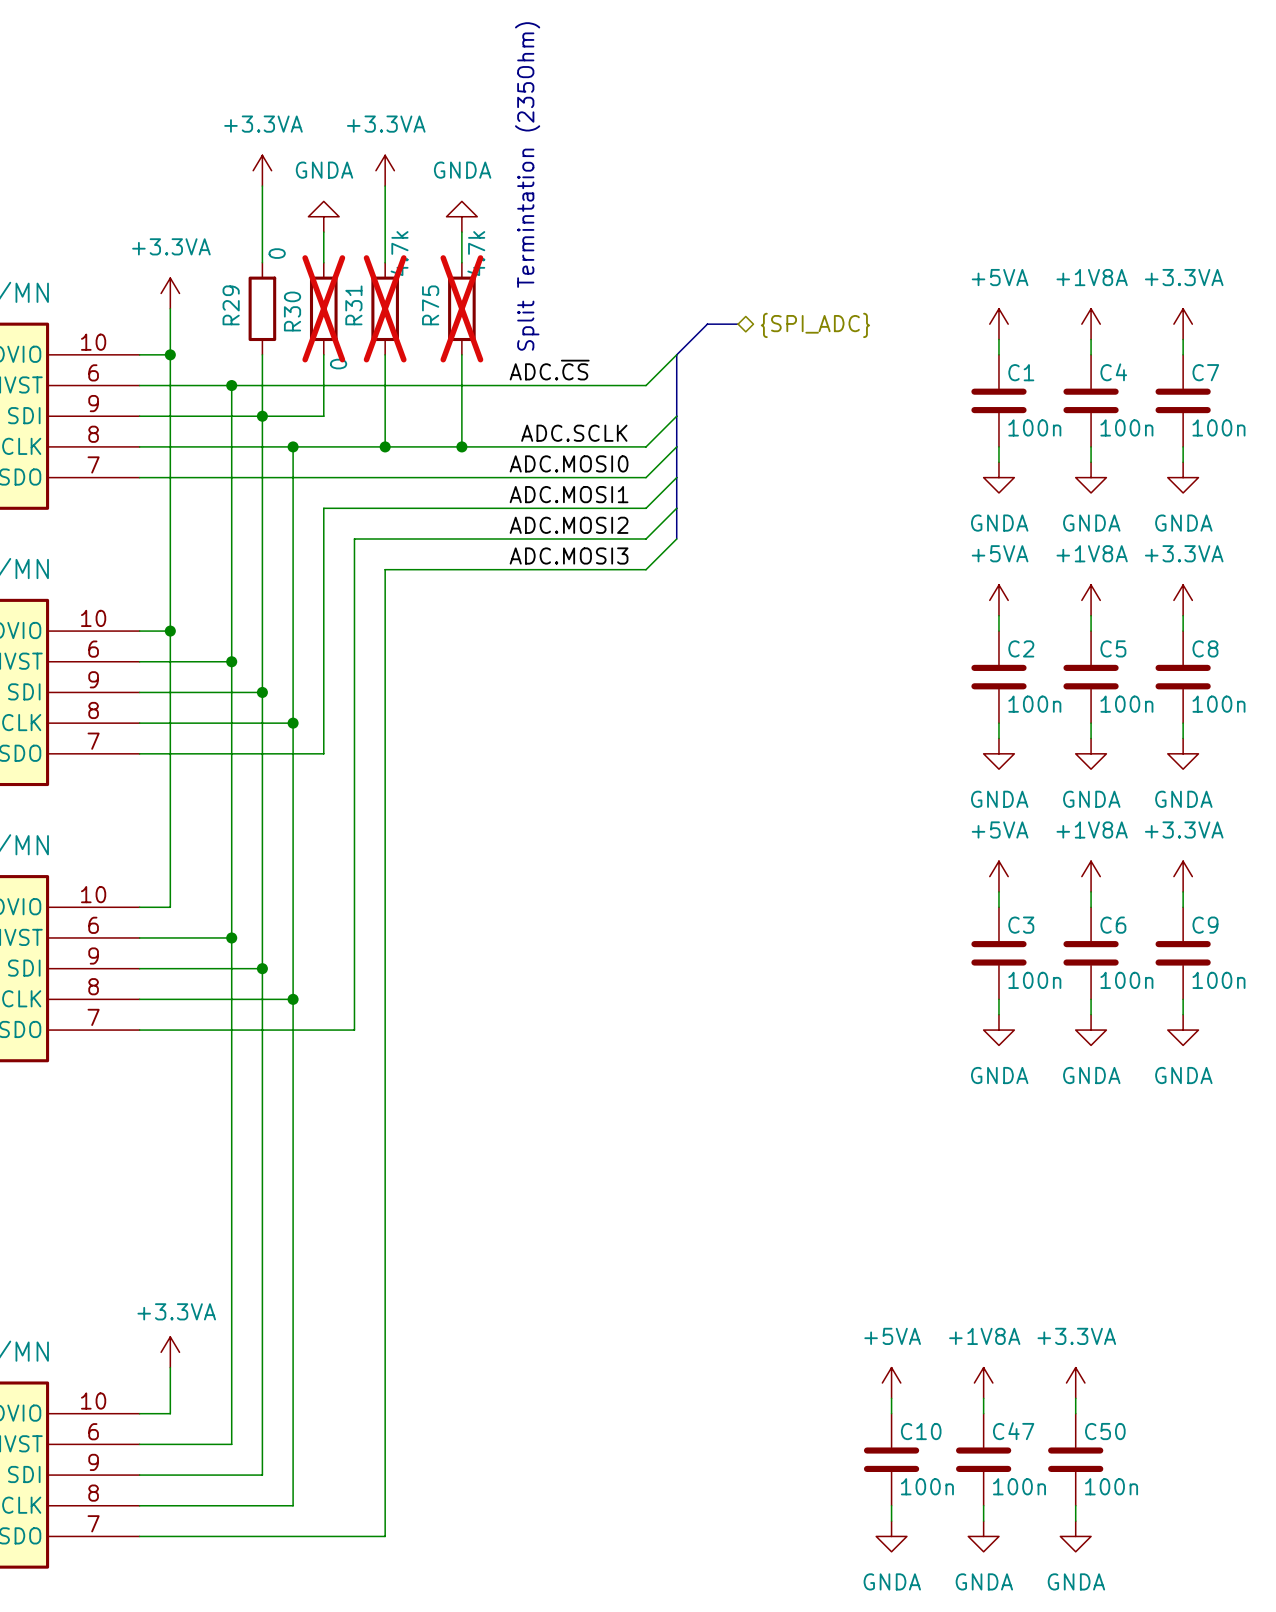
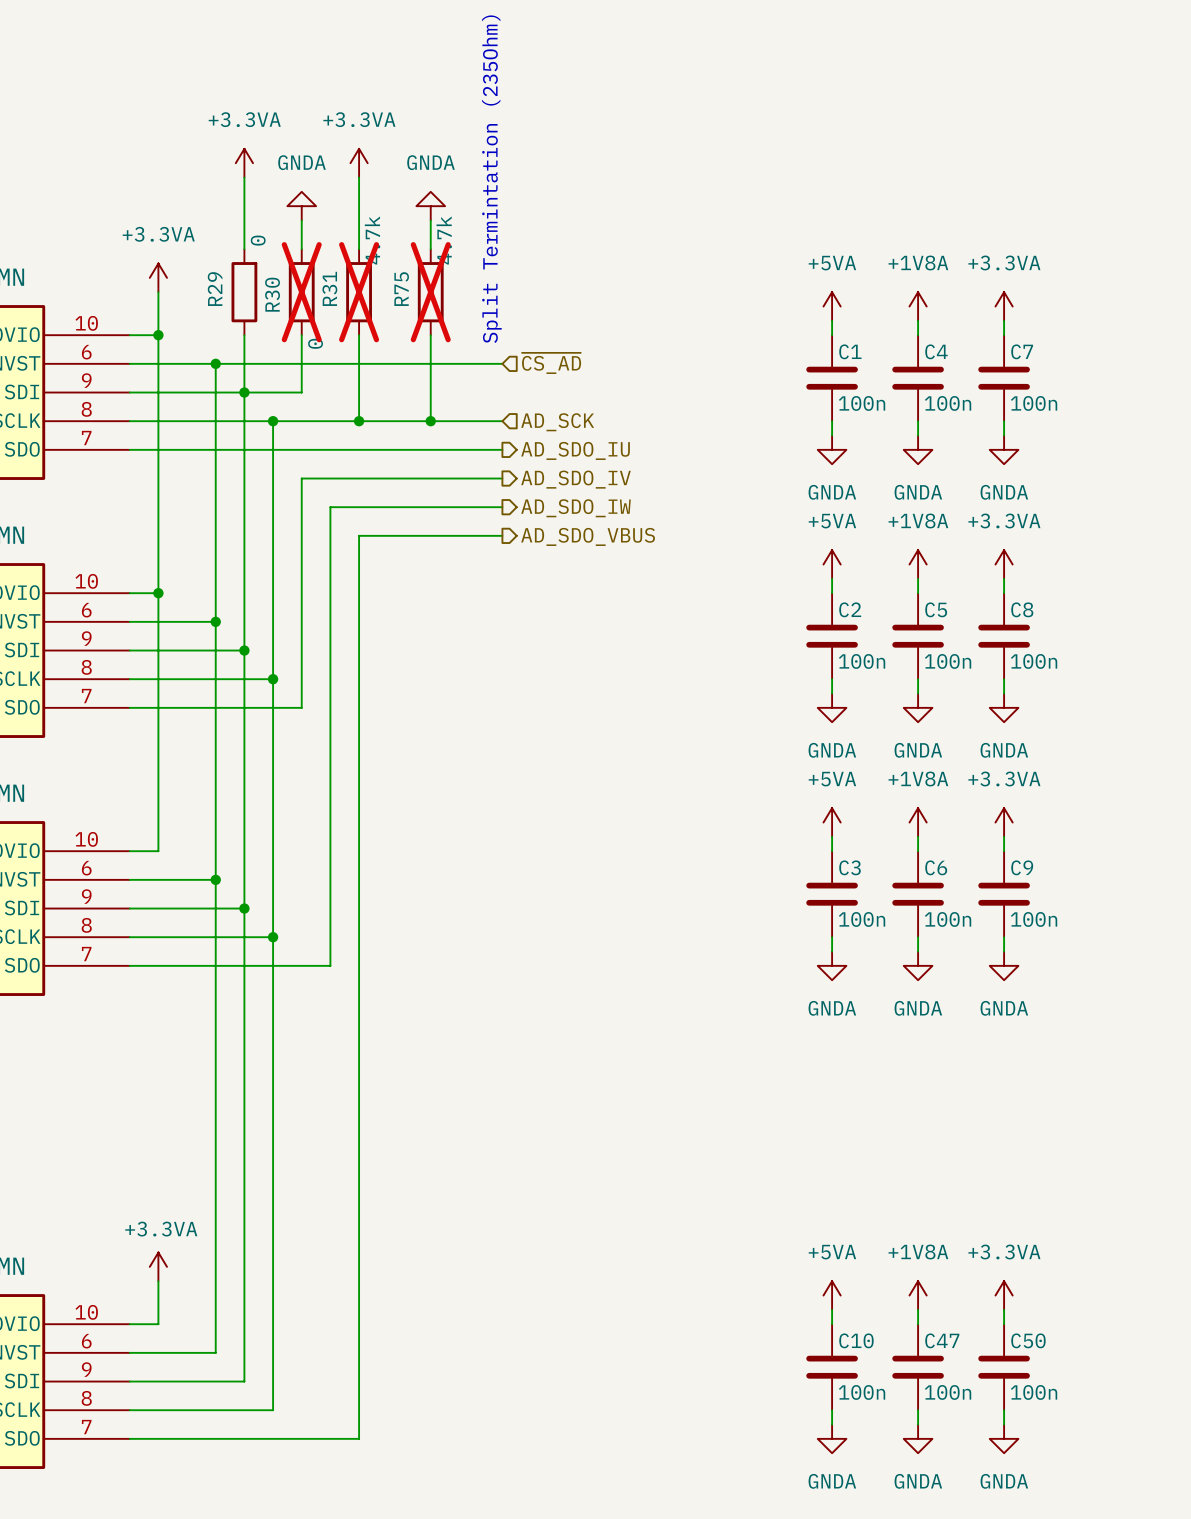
bus: (738, 324) (707, 324) (676, 354) (676, 538) -> none
power symbol position: +5VA (998, 324) -> +5VA (832, 306)
power symbol position: +1V8A (1091, 324) -> +1V8A (918, 306)
power symbol position: +3.3VA (1183, 324) -> +3.3VA (1004, 306)
hierarchical label: {SPI_ADC} (815, 325) -> none
wire: (998, 339) (998, 354) -> (832, 320) (832, 335)
wire: (1091, 339) (1091, 354) -> (918, 320) (918, 335)
wire: (1183, 339) (1183, 354) -> (1004, 320) (1004, 335)
wire: (676, 354) (646, 385) (538, 385) -> none
label: ADC.~{CS} (549, 370) -> none
hierarchical label: none -> ~{CS_AD} (551, 363)
C1 position: (998, 400) -> (832, 378)
C4 position: (1091, 400) -> (918, 378)
C7 position: (1183, 400) -> (1004, 378)
wire: (676, 416) (646, 446) (538, 446) -> none
label: ADC.SCLK (574, 433) -> none
wire: (676, 446) (646, 477) (538, 477) -> none
wire: (998, 446) (998, 462) -> (832, 421) (832, 435)
wire: (1091, 446) (1091, 462) -> (918, 421) (918, 435)
wire: (1183, 446) (1183, 462) -> (1004, 421) (1004, 435)
hierarchical label: none -> AD_SCK (557, 422)
label: ADC.MOSI0 (569, 463) -> none
hierarchical label: none -> AD_SDO_IU (575, 450)
wire: (676, 477) (646, 508) (538, 508) -> none
power symbol: none -> GNDA (832, 449)
power symbol position: GNDA (998, 477) -> GNDA (918, 449)
power symbol position: GNDA (1091, 477) -> GNDA (1004, 449)
power symbol: GNDA (1183, 477) -> none
label: ADC.MOSI1 (569, 494) -> none
hierarchical label: none -> AD_SDO_IV (576, 479)
wire: (676, 508) (646, 538) (538, 538) -> none
label: ADC.MOSI2 (569, 525) -> none
wire: (676, 538) (646, 569) (538, 569) -> none
hierarchical label: none -> AD_SDO_IW (576, 508)
label: ADC.MOSI3 (569, 555) -> none
hierarchical label: none -> AD_SDO_VBUS (588, 536)
power symbol position: +5VA (998, 600) -> +5VA (832, 564)
power symbol position: +1V8A (1091, 600) -> +1V8A (918, 564)
power symbol position: +3.3VA (1183, 600) -> +3.3VA (1004, 564)
wire: (998, 615) (998, 631) -> (832, 578) (832, 593)
wire: (1091, 615) (1091, 631) -> (918, 578) (918, 593)
wire: (1183, 615) (1183, 631) -> (1004, 578) (1004, 593)
C2 position: (998, 677) -> (832, 636)
C5 position: (1091, 677) -> (918, 636)
C8 position: (1183, 677) -> (1004, 636)
wire: (998, 723) (998, 738) -> (832, 679) (832, 693)
wire: (1091, 723) (1091, 738) -> (918, 679) (918, 693)
wire: (1183, 723) (1183, 738) -> (1004, 679) (1004, 693)
power symbol: none -> GNDA (832, 707)
power symbol position: GNDA (998, 753) -> GNDA (918, 707)
power symbol position: GNDA (1091, 753) -> GNDA (1004, 707)
power symbol: GNDA (1183, 753) -> none
power symbol position: +5VA (998, 876) -> +5VA (832, 822)
power symbol position: +1V8A (1091, 876) -> +1V8A (918, 822)
power symbol position: +3.3VA (1183, 876) -> +3.3VA (1004, 822)
wire: (998, 891) (998, 907) -> (832, 836) (832, 851)
wire: (1091, 891) (1091, 907) -> (918, 836) (918, 851)
wire: (1183, 891) (1183, 907) -> (1004, 836) (1004, 851)
C3 position: (998, 953) -> (832, 894)
C6 position: (1091, 953) -> (918, 894)
C9 position: (1183, 953) -> (1004, 894)
wire: (998, 999) (998, 1014) -> (832, 937) (832, 951)
wire: (1091, 999) (1091, 1014) -> (918, 937) (918, 951)
wire: (1183, 999) (1183, 1014) -> (1004, 937) (1004, 951)
power symbol: none -> GNDA (832, 965)
power symbol position: GNDA (998, 1030) -> GNDA (918, 965)
power symbol position: GNDA (1091, 1030) -> GNDA (1004, 965)
power symbol: GNDA (1183, 1030) -> none

